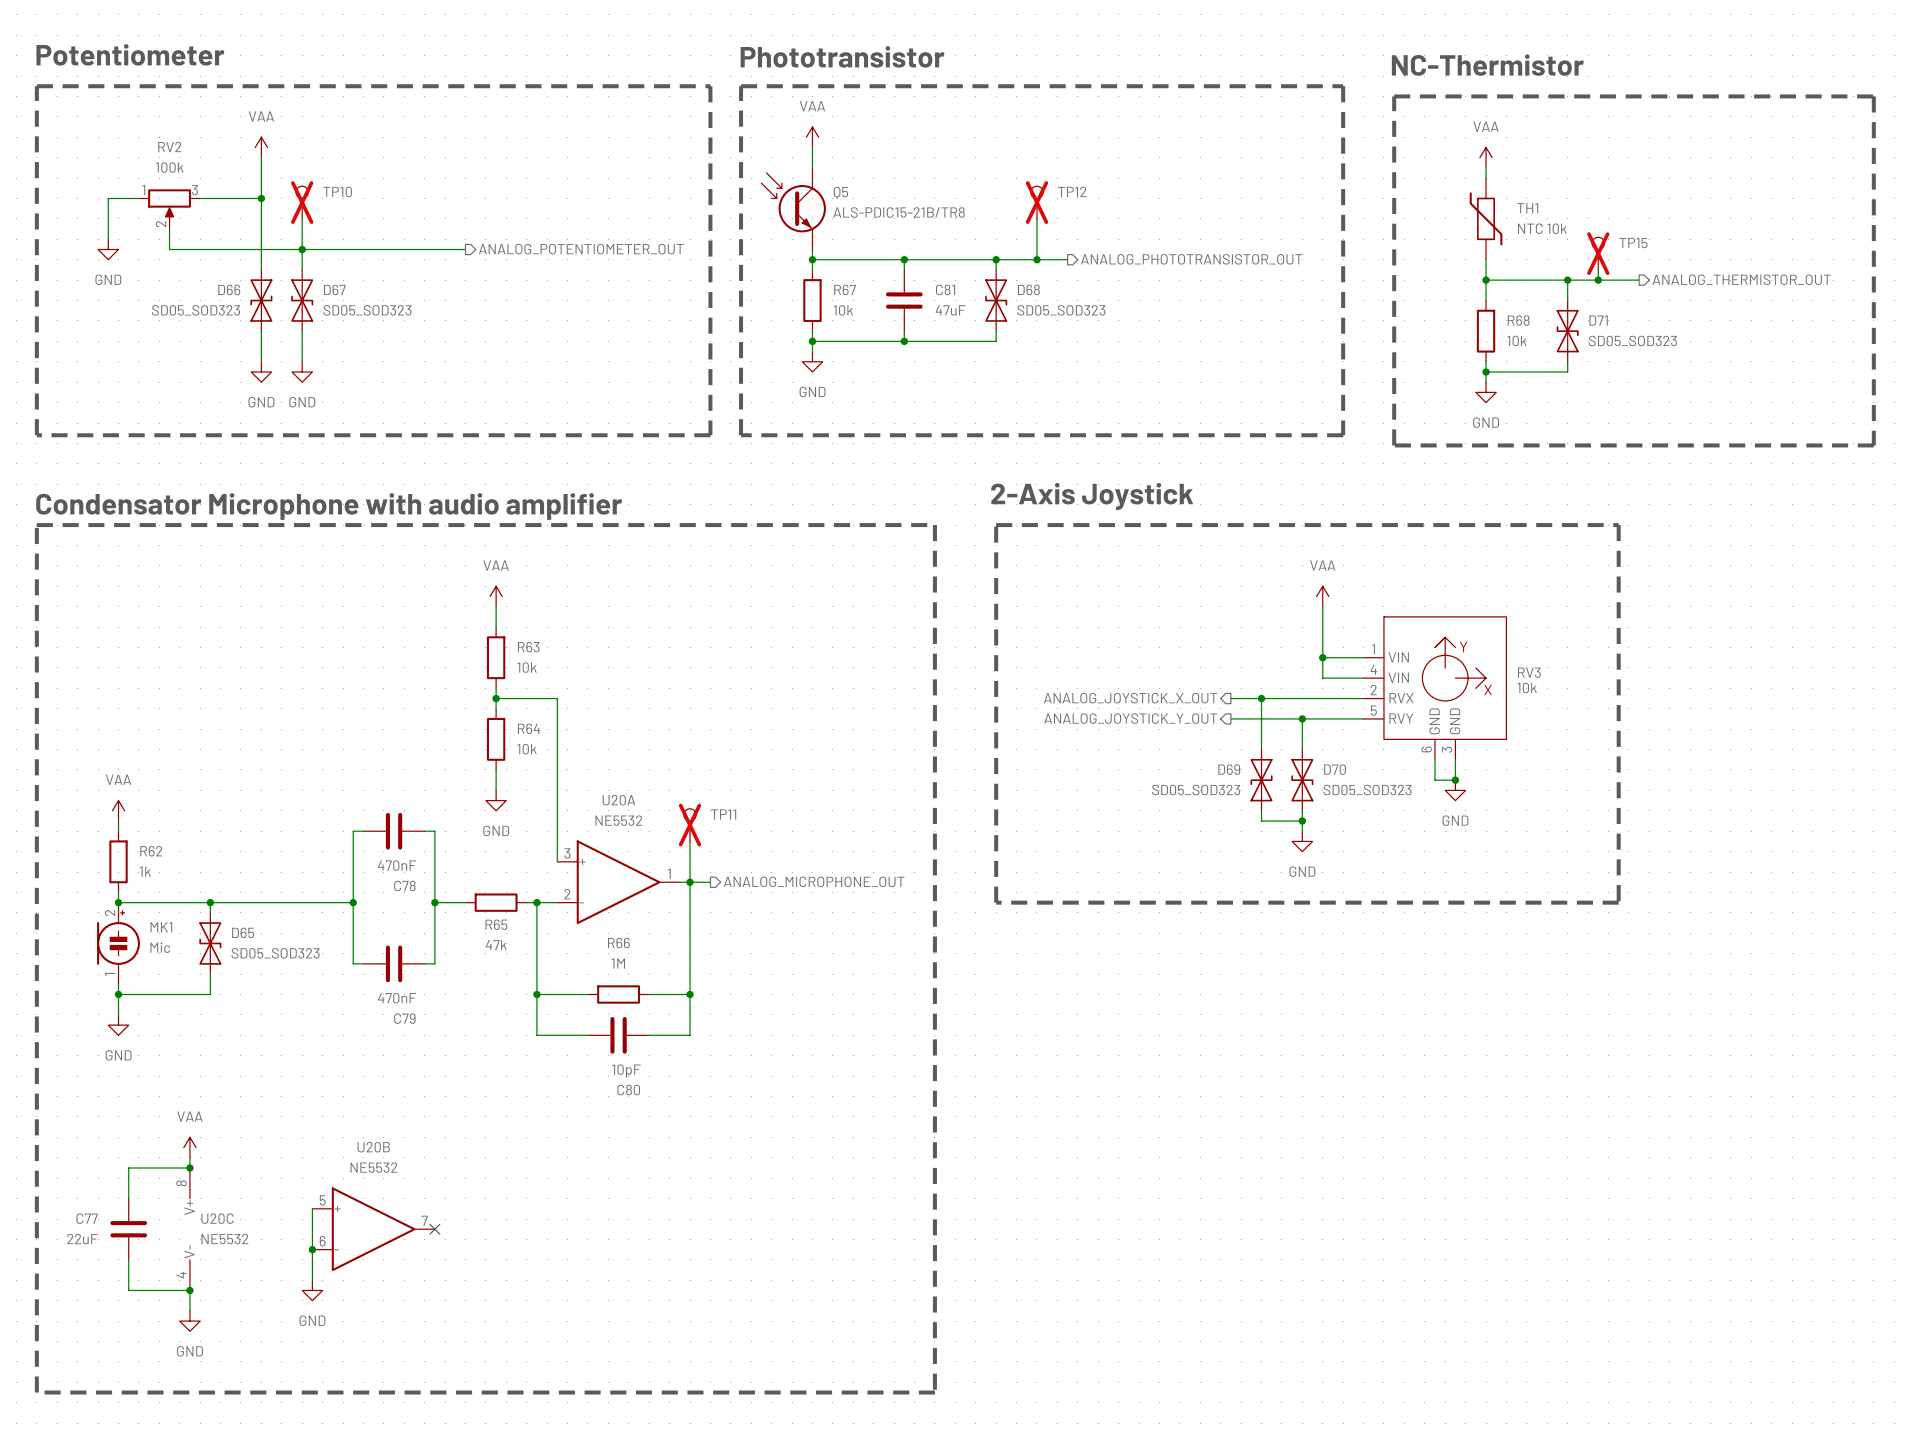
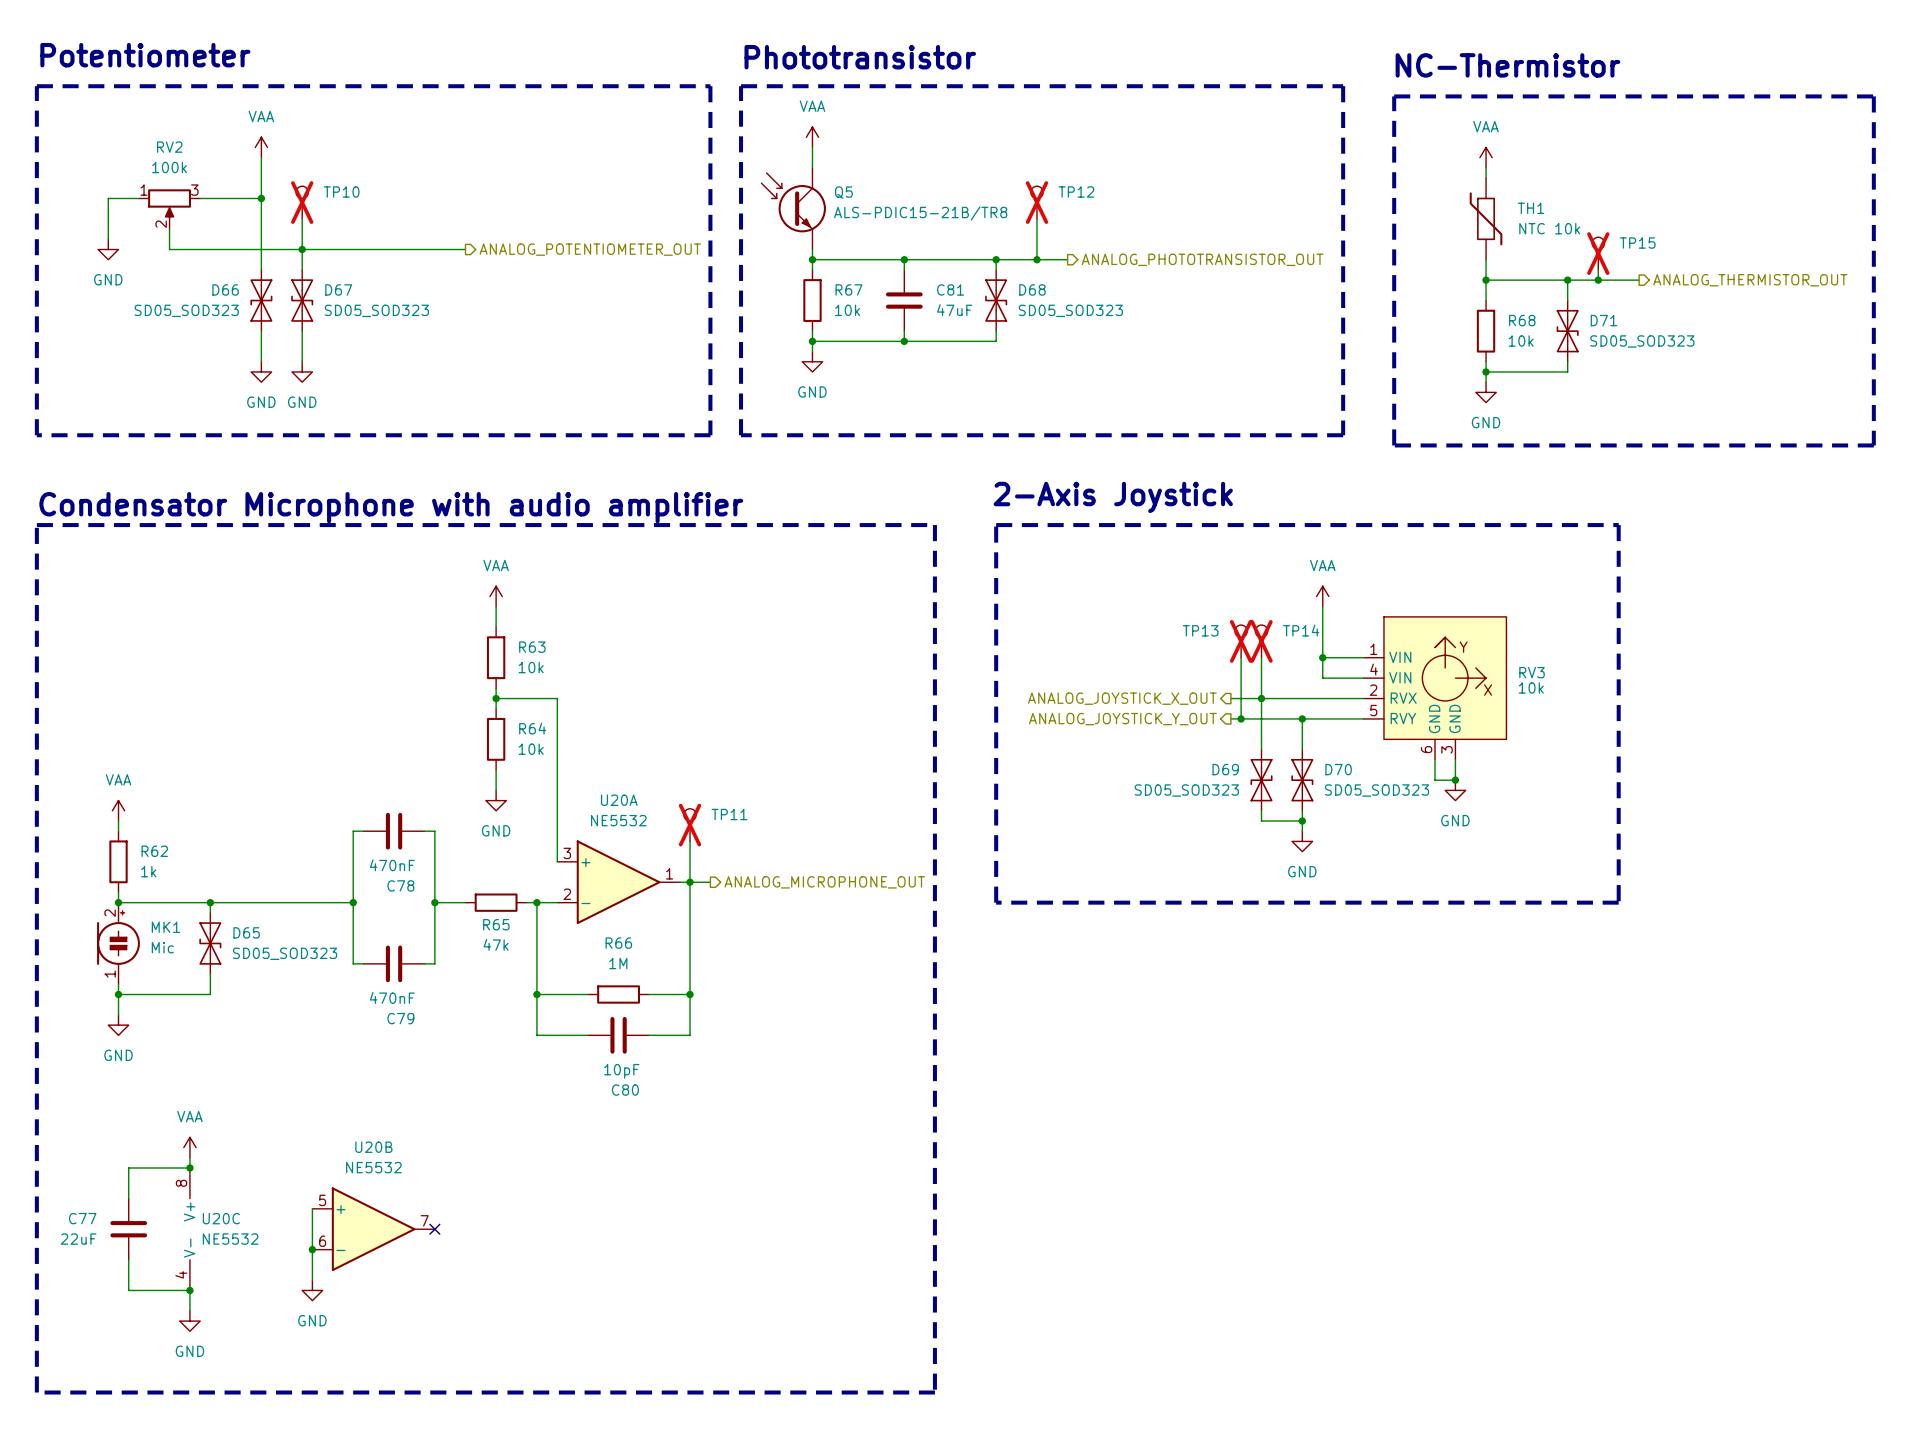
TP13: none -> (1241, 641)
TP14: none -> (1261, 641)
wire: none -> (1241, 657) (1241, 718)
wire: none -> (1261, 657) (1261, 698)
junction: none -> (1241, 718)

